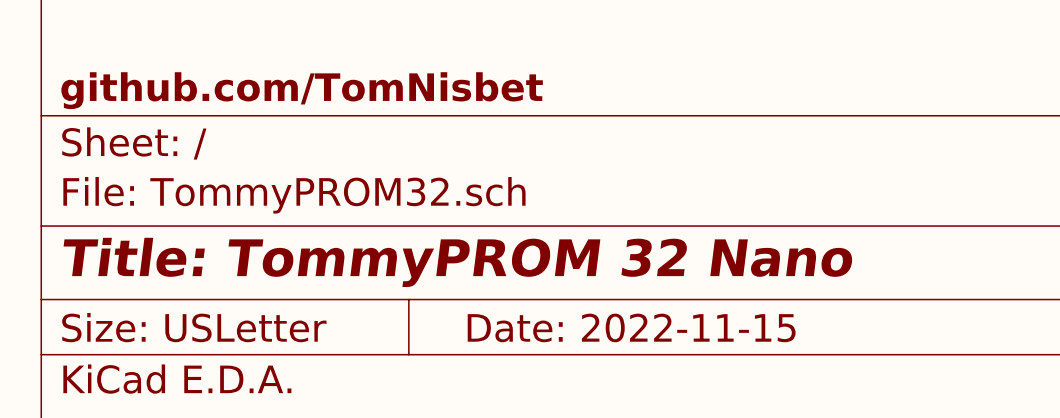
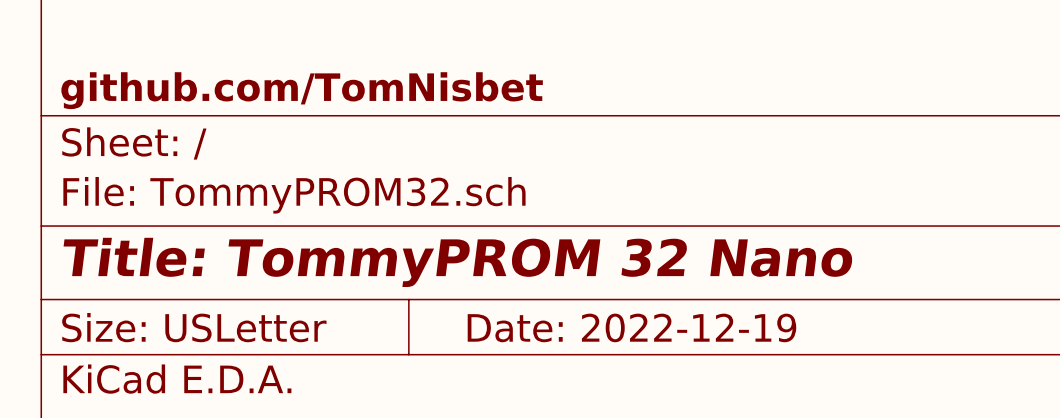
title block: Date: 2022-11-15 (631, 327) -> Date: 2022-12-19 (631, 327)

